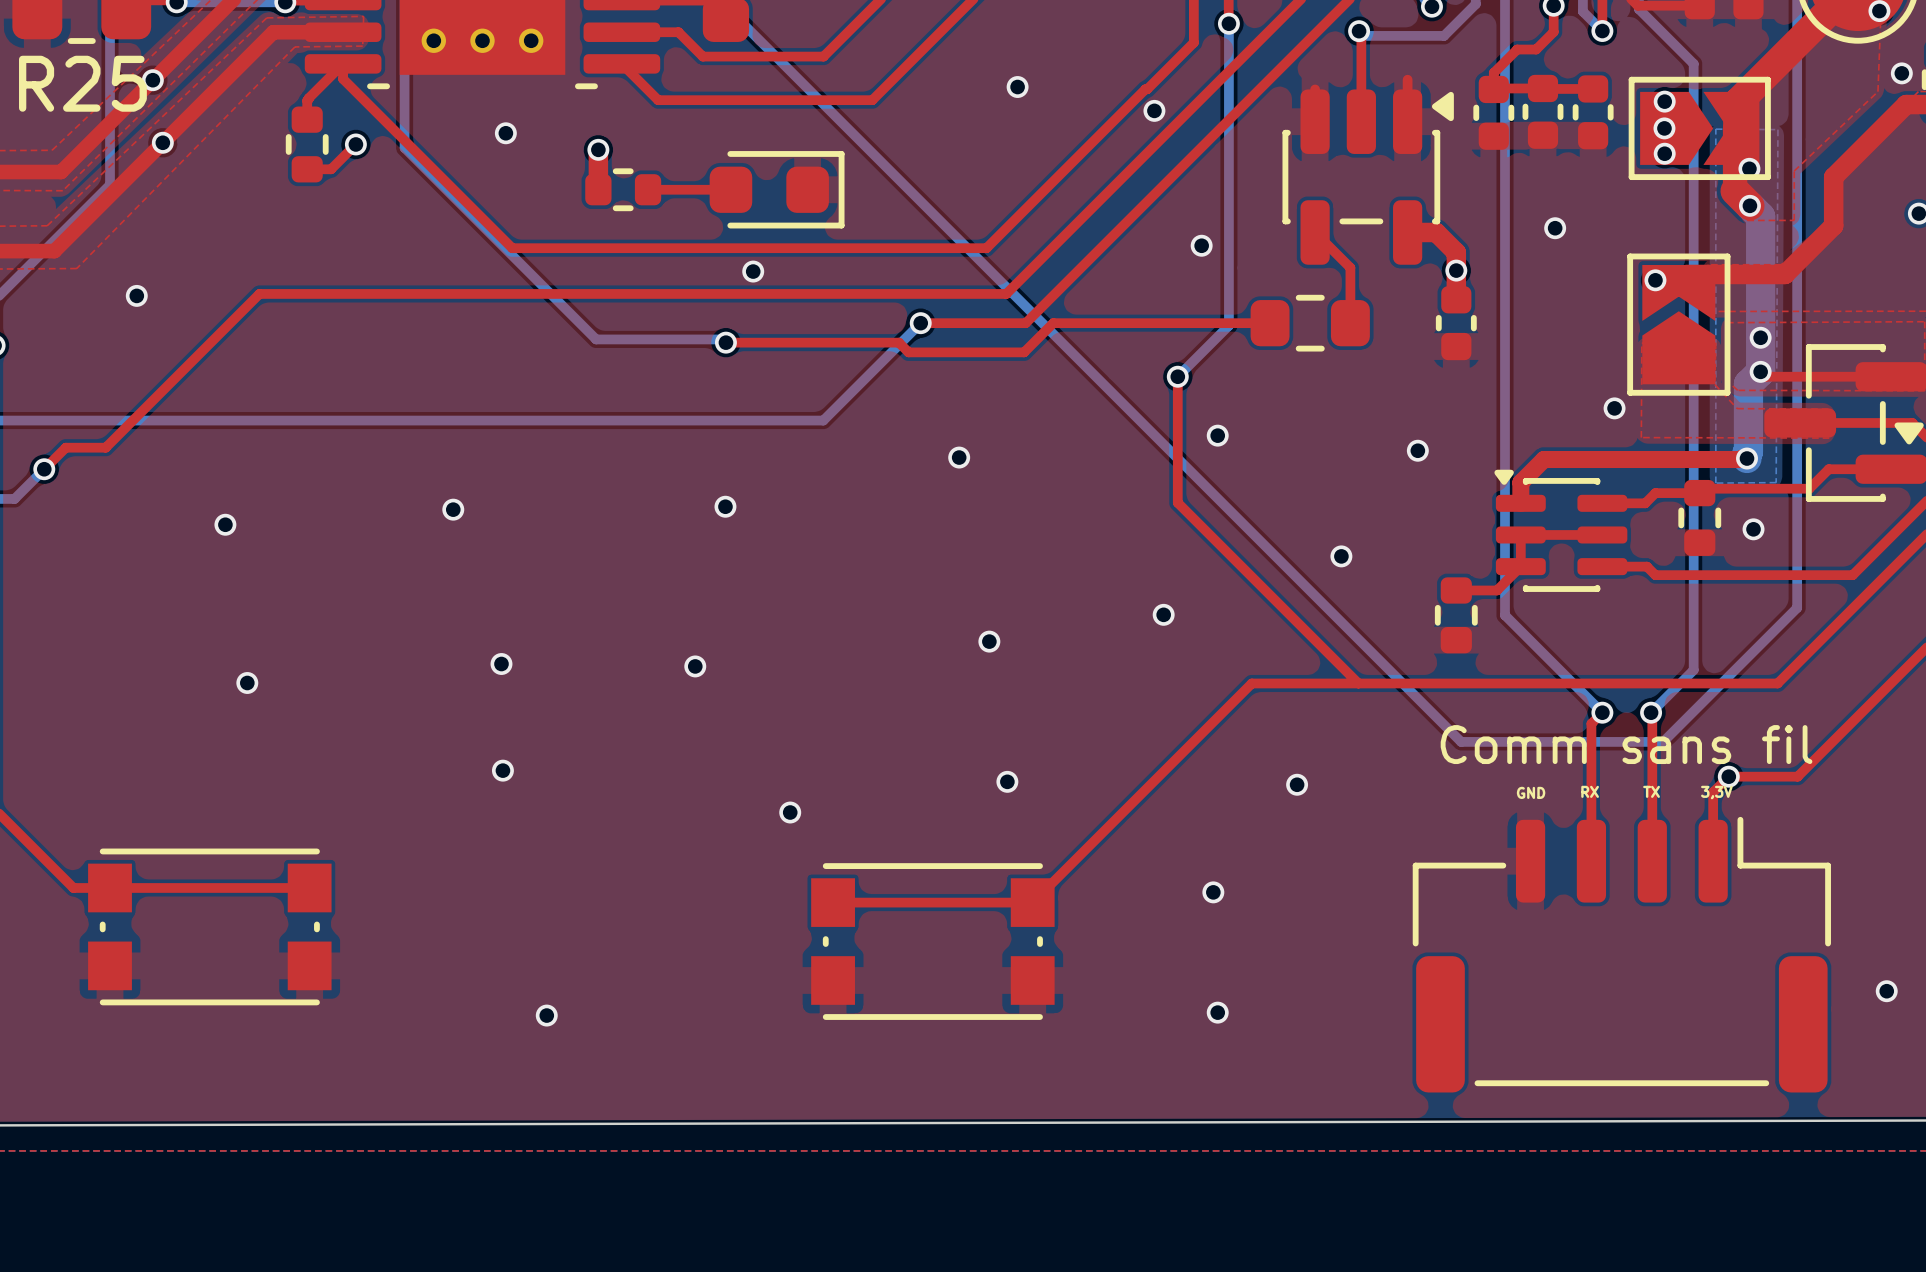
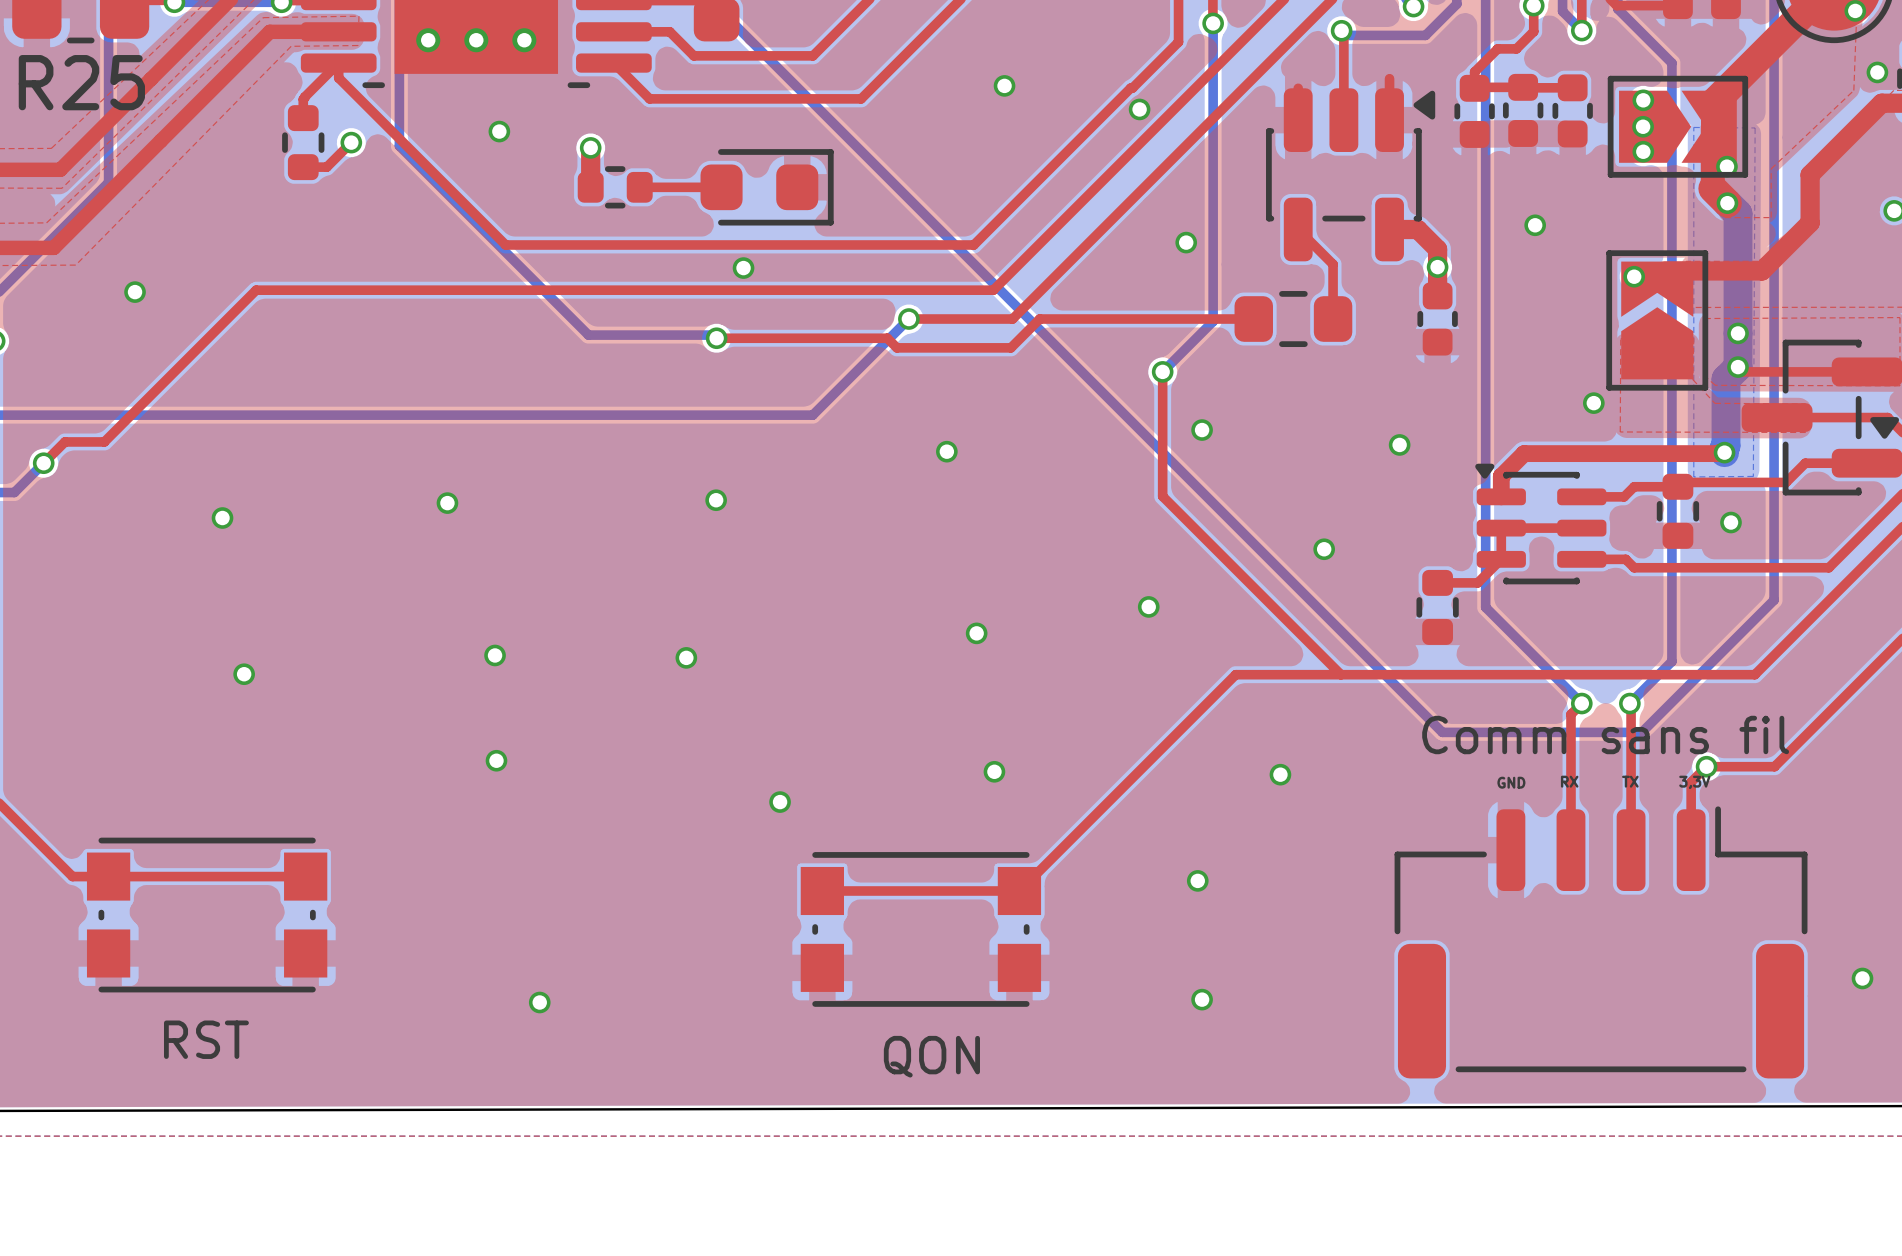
via: (152, 80) -> none
via: (162, 142) -> none
text: none -> RST (206, 1039)
text: none -> QON (931, 1056)

